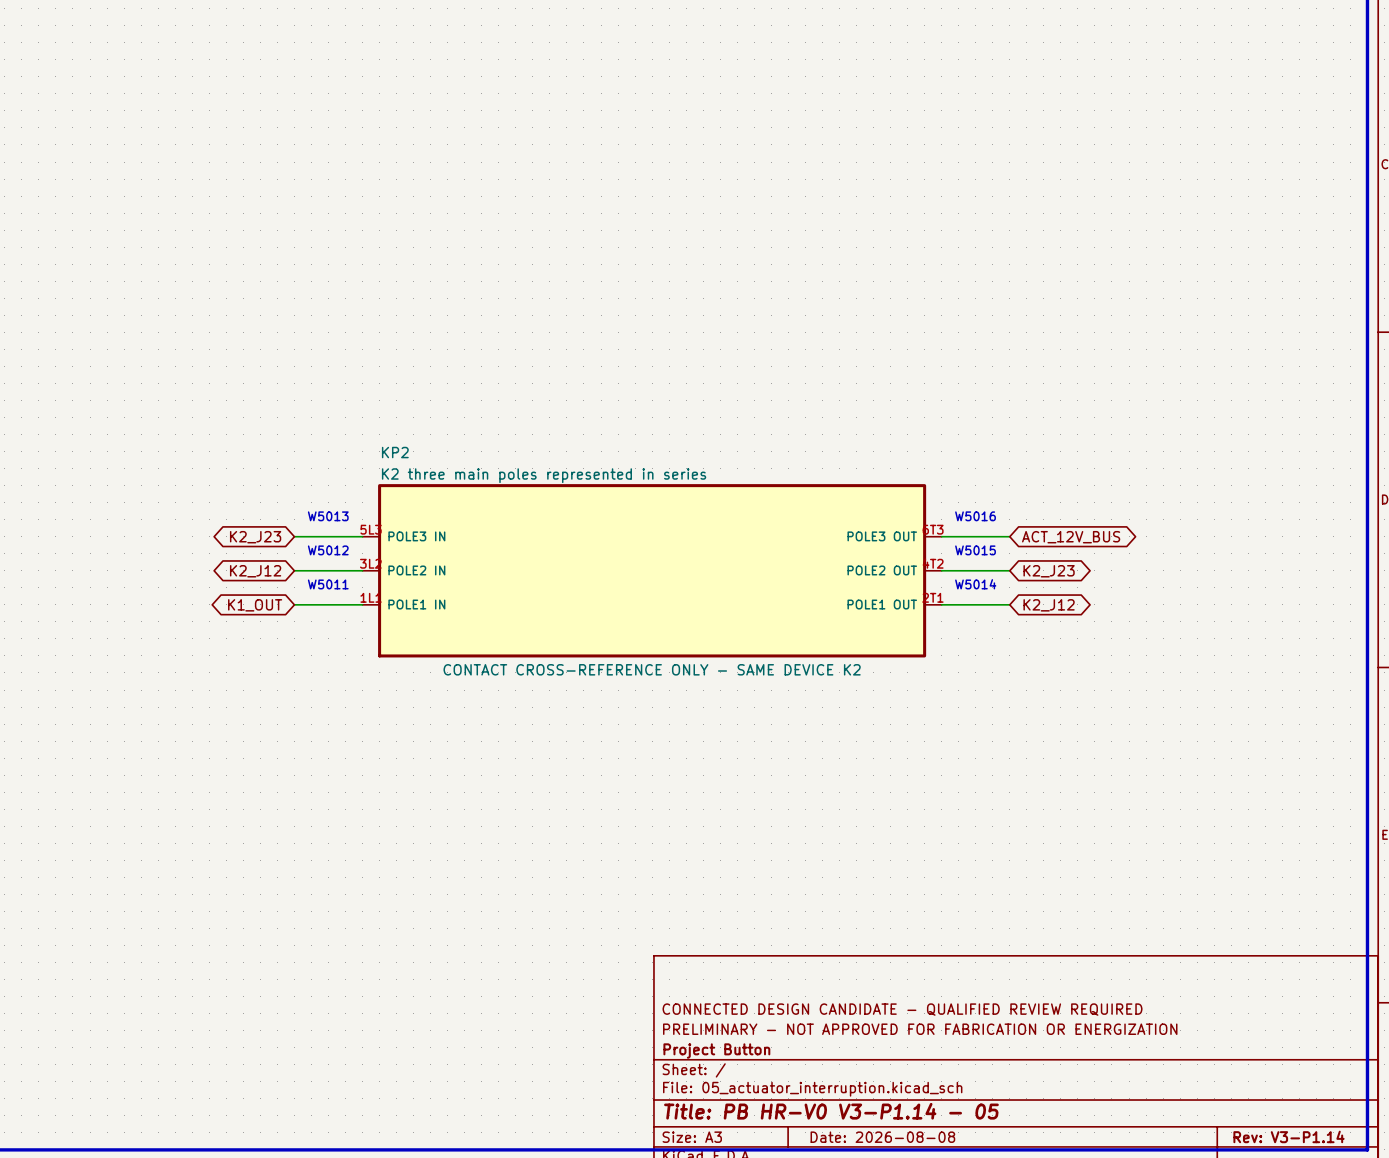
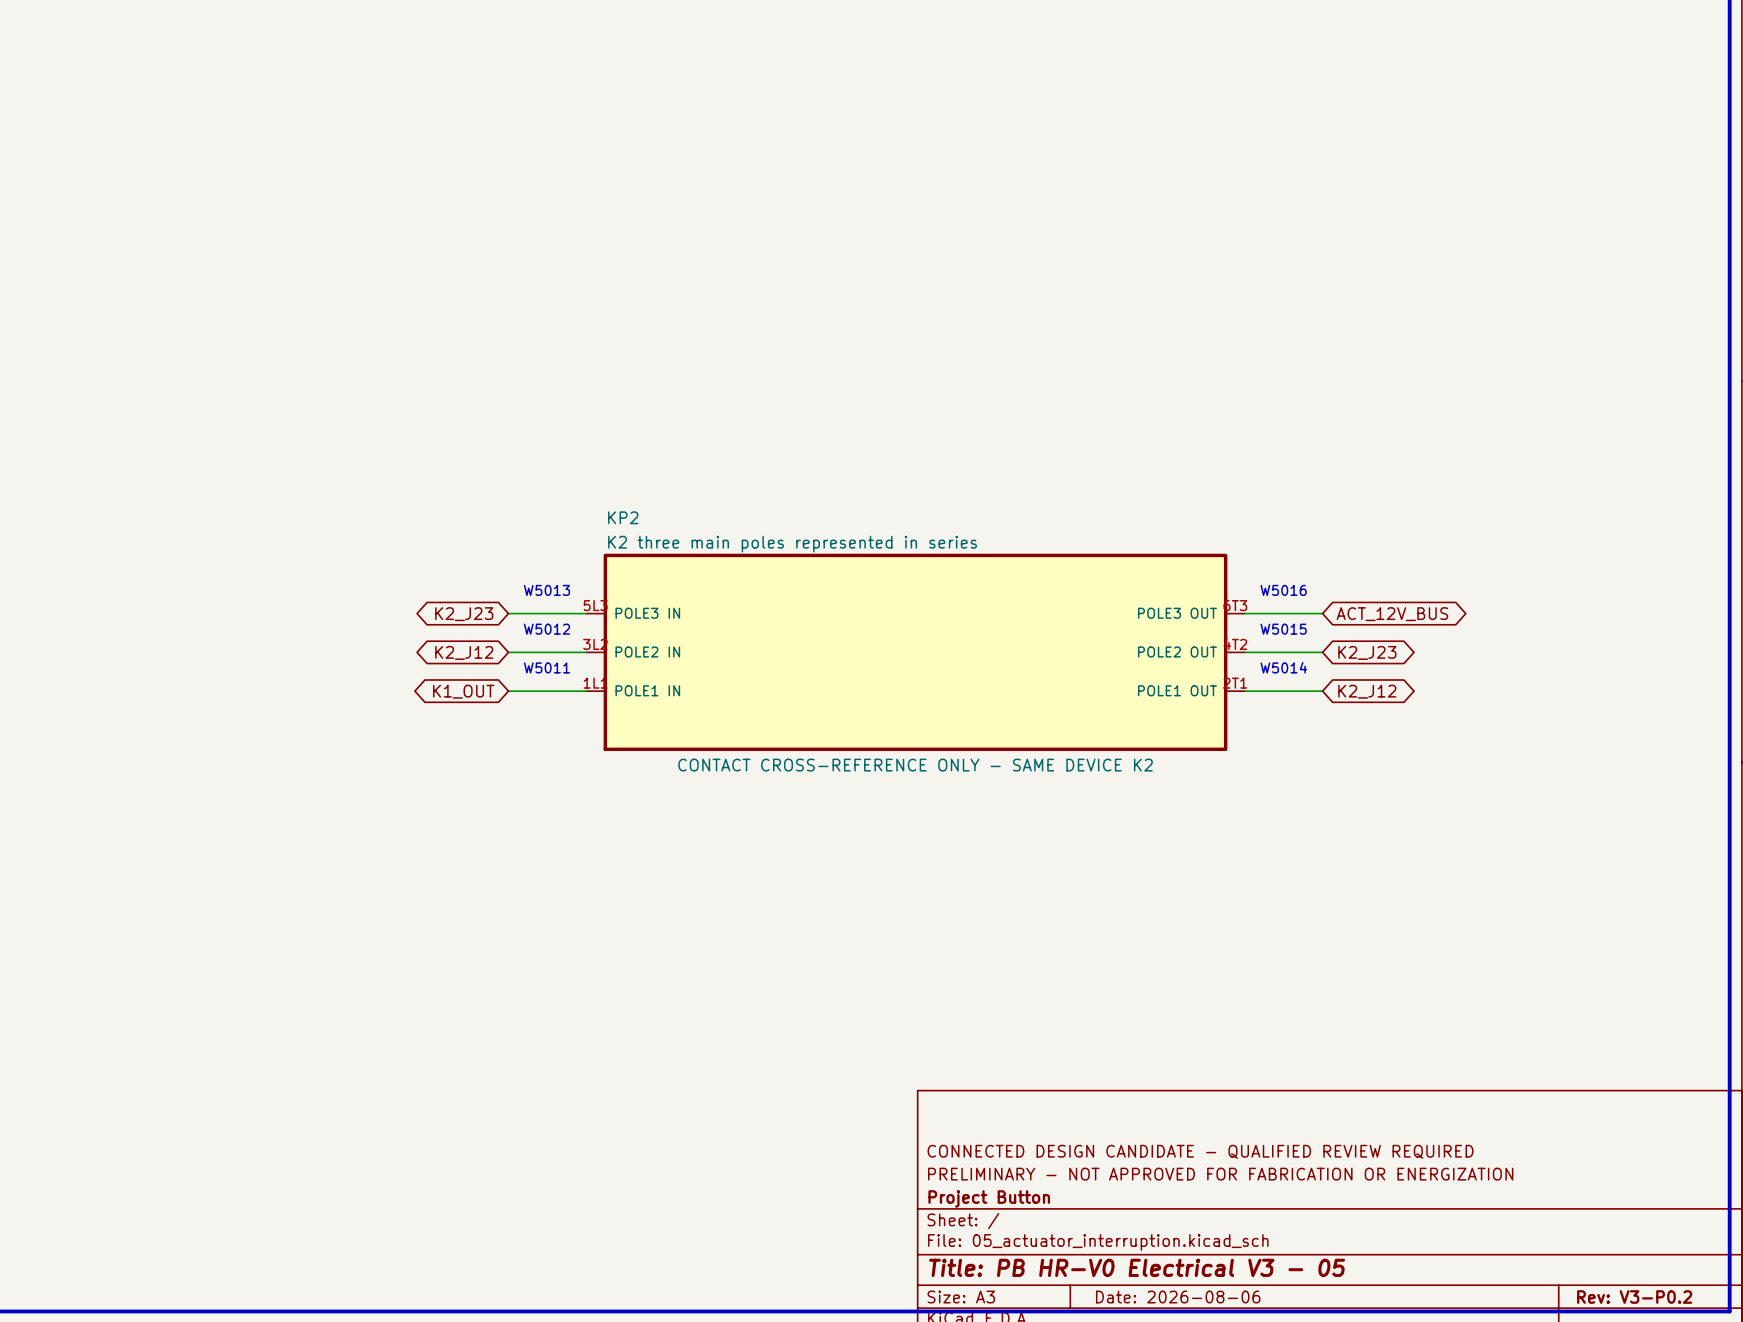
title block: Title: PB HR-V0 V3-P1.14 - 05 (831, 1111) -> Title: PB HR-V0 Electrical V3 - 05 (1137, 1267)
title block: Rev: V3-P1.14 (1289, 1136) -> Rev: V3-P0.2 (1634, 1297)
title block: Date: 2026-08-08 (882, 1137) -> Date: 2026-08-06 (1178, 1297)

